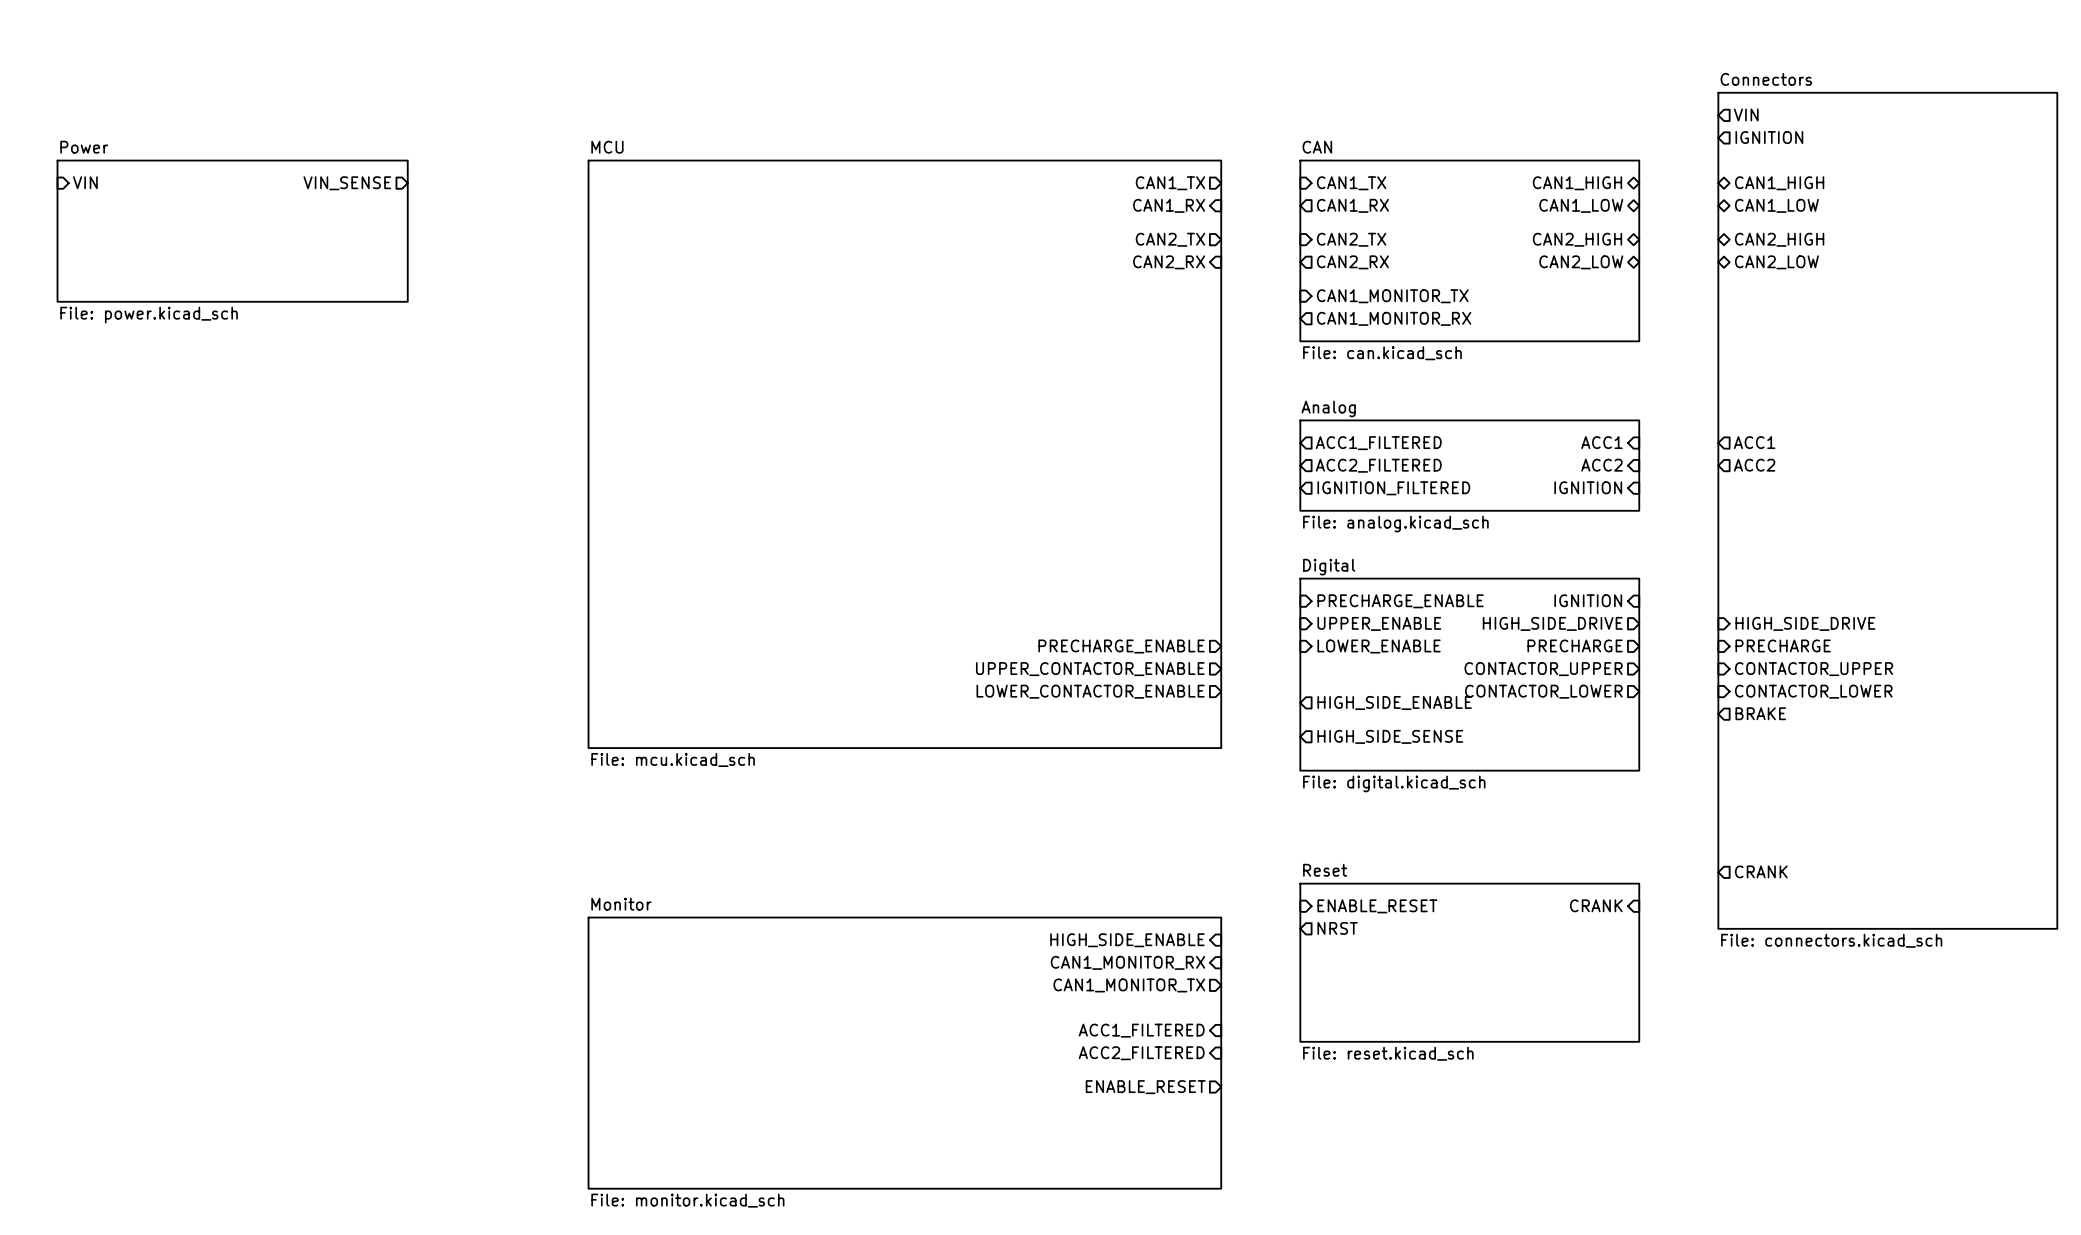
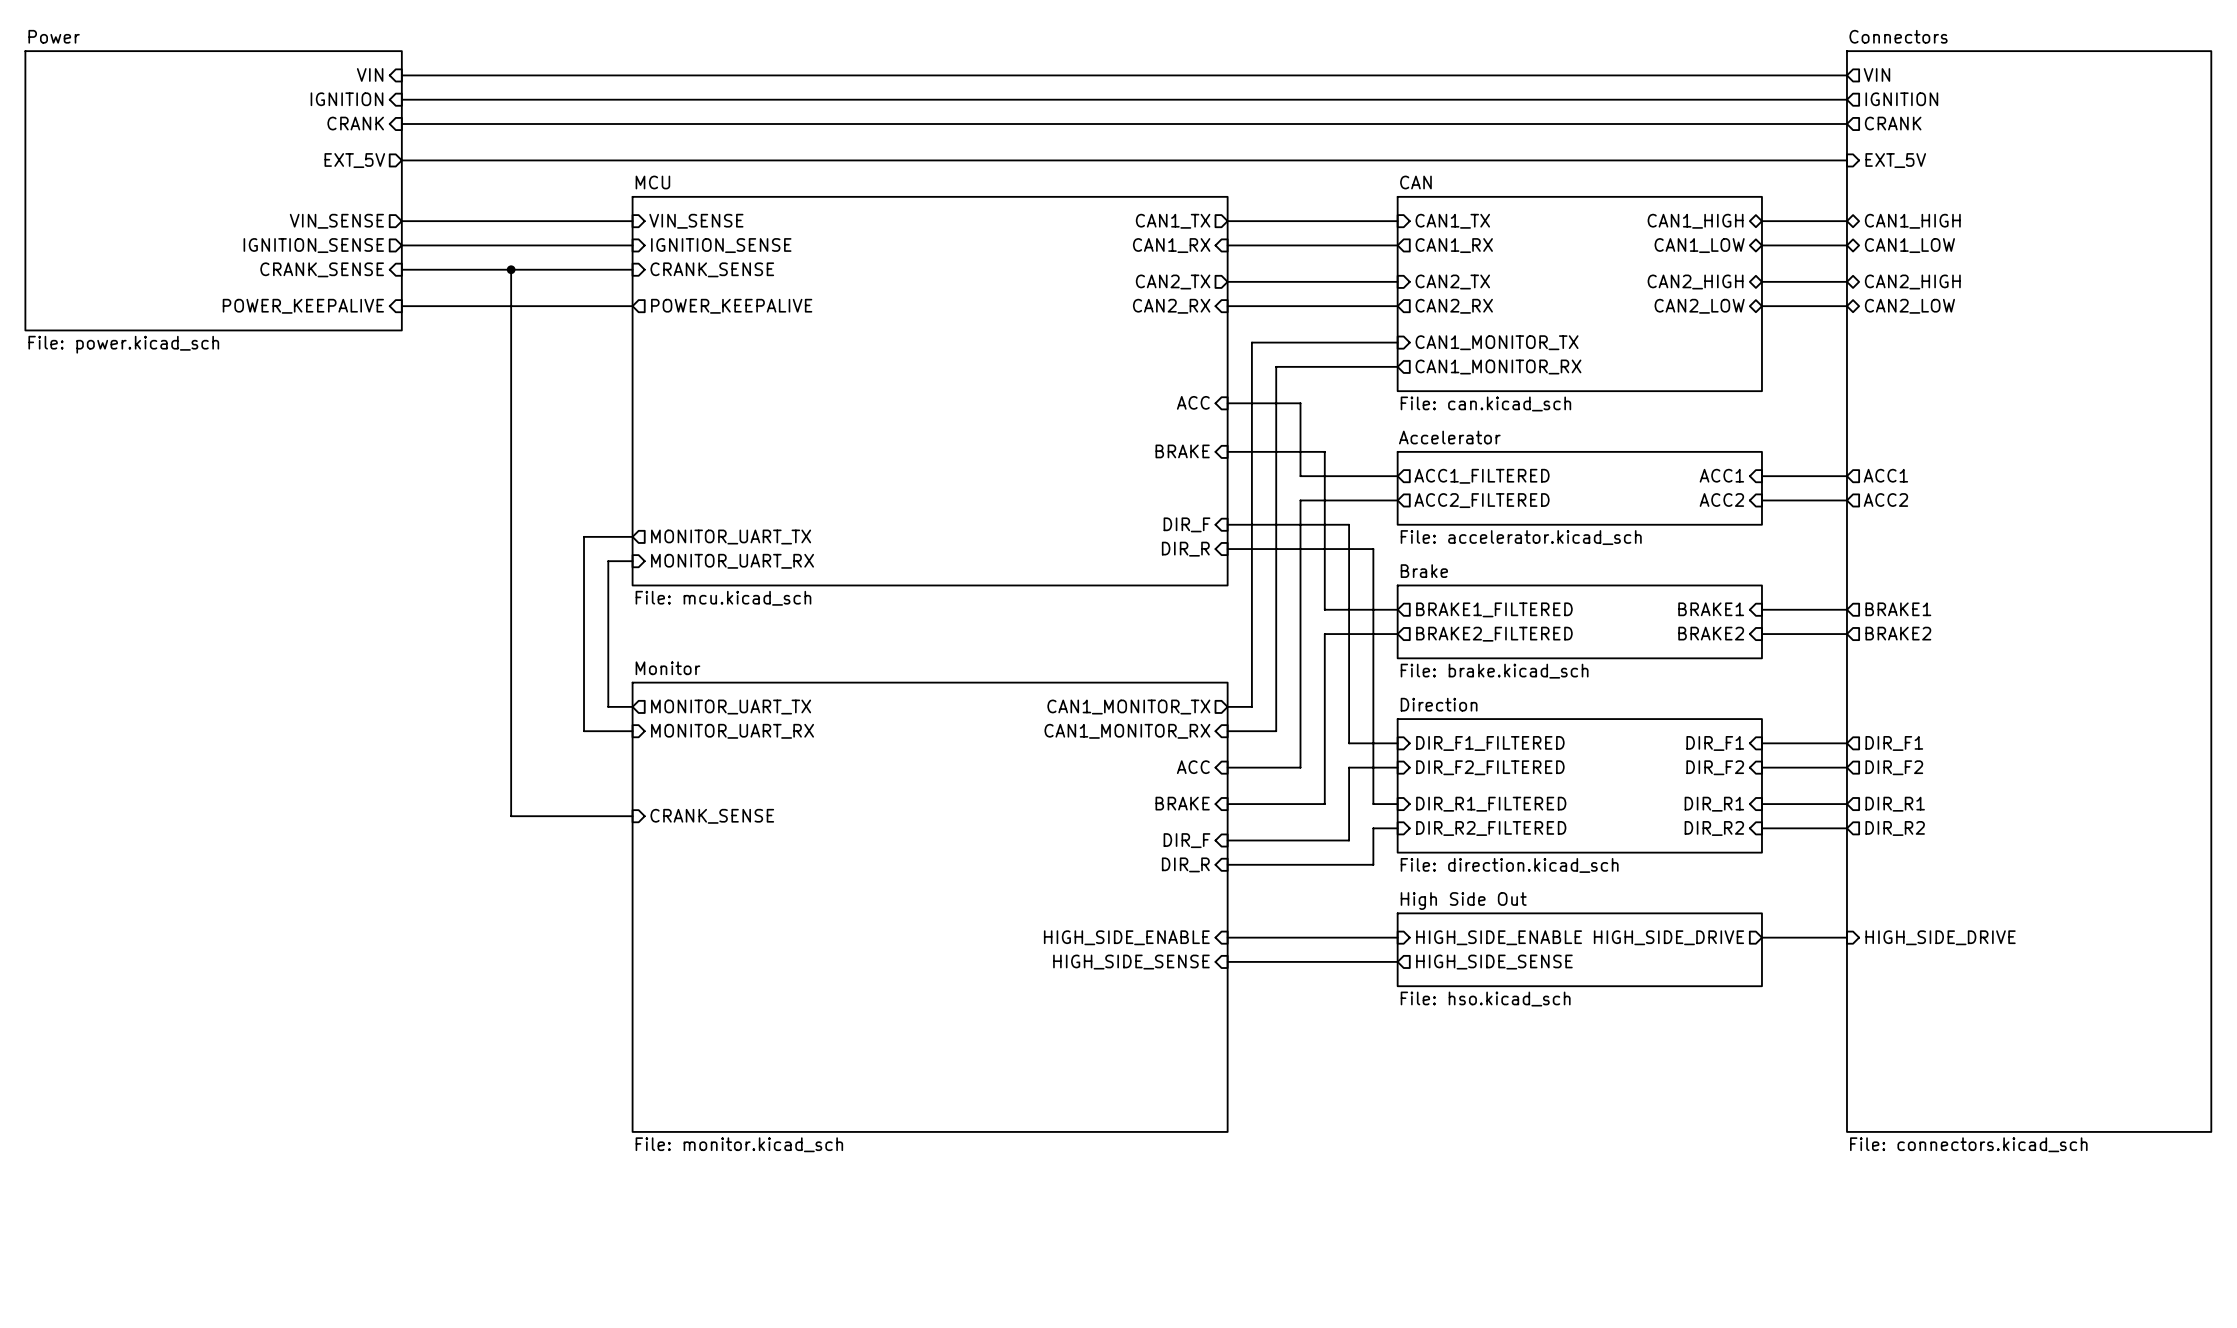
sheet pin: none -> VIN (370, 74)
sheet pin: none -> VIN (1876, 74)
wire: none -> (401, 75) (1846, 75)
sheet pin: none -> IGNITION (347, 99)
wire: none -> (401, 99) (1846, 99)
sheet pin: none -> CRANK (355, 123)
sheet pin: VIN (1746, 114) -> CRANK (1893, 123)
wire: none -> (401, 124) (1846, 124)
sheet pin position: IGNITION (1769, 137) -> IGNITION (1901, 99)
sheet pin: none -> EXT_5V (354, 160)
wire: none -> (401, 160) (1846, 160)
sheet pin: none -> EXT_5V (1895, 160)
sheet Power: none -> File: power.kicad_sch (213, 190)
sheet pin: VIN (85, 182) -> none
sheet pin position: VIN_SENSE (347, 183) -> VIN_SENSE (336, 221)
sheet pin position: CAN1_TX (1170, 183) -> CAN1_TX (1173, 221)
sheet pin: CAN1_TX (1351, 183) -> none
sheet pin: CAN1_HIGH (1577, 183) -> none
sheet pin: CAN1_HIGH (1779, 183) -> none
wire: none -> (401, 221) (632, 221)
sheet pin: none -> VIN_SENSE (696, 221)
wire: none -> (1227, 221) (1397, 221)
sheet pin position: CAN1_RX (1169, 205) -> CAN1_RX (1171, 245)
sheet pin shape: output (1352, 205) -> input (1452, 221)
sheet pin: CAN1_RX (1352, 205) -> CAN1_TX (1452, 221)
sheet pin: CAN1_LOW (1581, 205) -> CAN1_HIGH (1695, 221)
wire: none -> (1761, 221) (1846, 221)
sheet pin: CAN1_LOW (1776, 205) -> CAN1_HIGH (1912, 221)
sheet pin: none -> IGNITION_SENSE (313, 245)
wire: none -> (401, 245) (632, 245)
sheet pin: none -> IGNITION_SENSE (721, 245)
wire: none -> (1227, 245) (1397, 245)
sheet pin: none -> CAN1_LOW (1699, 245)
wire: none -> (1761, 245) (1846, 245)
sheet pin: none -> CAN1_LOW (1909, 245)
sheet Power: File: power.kicad_sch (232, 231) -> none
sheet pin position: CAN2_TX (1170, 239) -> CAN2_TX (1173, 281)
sheet pin shape: input (1351, 239) -> output (1454, 245)
sheet pin: CAN2_TX (1351, 239) -> CAN1_RX (1454, 245)
sheet pin: CAN2_HIGH (1577, 239) -> none
sheet pin: CAN2_HIGH (1779, 239) -> none
wire: none -> (401, 269) (632, 269)
wire: none -> (511, 269) (511, 816) (632, 816)
junction: none -> (511, 269)
sheet CAN position: (1469, 250) -> (1579, 294)
sheet pin: none -> CRANK_SENSE (322, 269)
sheet pin: none -> CRANK_SENSE (712, 269)
wire: none -> (1227, 281) (1397, 281)
sheet pin position: CAN2_RX (1169, 262) -> CAN2_RX (1171, 306)
sheet pin shape: output (1352, 262) -> input (1452, 281)
sheet pin: CAN2_RX (1352, 262) -> CAN2_TX (1452, 281)
sheet pin: CAN2_LOW (1581, 262) -> CAN2_HIGH (1695, 281)
wire: none -> (1761, 281) (1846, 281)
sheet pin: CAN2_LOW (1776, 262) -> CAN2_HIGH (1912, 281)
sheet pin: none -> POWER_KEEPALIVE (303, 306)
wire: none -> (401, 306) (632, 306)
sheet pin: none -> POWER_KEEPALIVE (731, 306)
wire: none -> (1227, 306) (1397, 306)
sheet pin: none -> CAN2_RX (1454, 306)
sheet pin: none -> CAN2_LOW (1699, 306)
wire: none -> (1761, 306) (1846, 306)
sheet pin: none -> CAN2_LOW (1909, 306)
sheet pin: CAN1_MONITOR_TX (1392, 296) -> none
wire: none -> (1397, 342) (1251, 342) (1251, 706) (1227, 706)
sheet pin shape: output (1394, 318) -> input (1497, 342)
sheet pin: CAN1_MONITOR_RX (1394, 318) -> CAN1_MONITOR_TX (1497, 342)
wire: none -> (1397, 366) (1276, 366) (1276, 731) (1227, 731)
sheet pin: none -> CAN1_MONITOR_RX (1498, 367)
sheet MCU: none -> File: mcu.kicad_sch (930, 391)
sheet pin: none -> ACC (1193, 402)
wire: none -> (1227, 403) (1300, 403) (1300, 476) (1397, 476)
sheet pin: none -> BRAKE (1182, 451)
wire: none -> (1227, 451) (1324, 451) (1324, 609) (1397, 609)
wire: none -> (1761, 476) (1846, 476)
sheet MCU: File: mcu.kicad_sch (904, 454) -> none
sheet Accelerator: none -> File: accelerator.kicad_sch (1579, 488)
wire: none -> (1397, 500) (1300, 500) (1300, 767) (1227, 767)
sheet Analog: File: analog.kicad_sch (1469, 465) -> none
wire: none -> (1761, 500) (1846, 500)
sheet pin: IGNITION (1588, 487) -> none
sheet pin: none -> DIR_F (1186, 524)
wire: none -> (1227, 524) (1349, 524) (1349, 743) (1397, 743)
sheet pin: IGNITION_FILTERED (1393, 488) -> none
wire: none -> (632, 536) (584, 536) (584, 731) (632, 731)
sheet pin: none -> MONITOR_UART_TX (731, 537)
sheet pin: none -> DIR_R (1185, 549)
wire: none -> (1227, 549) (1373, 549) (1373, 804) (1397, 804)
sheet Connectors: File: connectors.kicad_sch (1887, 510) -> none
wire: none -> (632, 561) (608, 561) (608, 706) (632, 706)
sheet pin: none -> MONITOR_UART_RX (732, 561)
sheet Connectors: none -> File: connectors.kicad_sch (2029, 591)
sheet pin: none -> BRAKE1 (1711, 609)
sheet pin: none -> BRAKE1 (1898, 609)
sheet pin: none -> BRAKE1_FILTERED (1494, 609)
wire: none -> (1761, 609) (1846, 609)
sheet Brake: none -> File: brake.kicad_sch (1579, 621)
wire: none -> (1397, 634) (1324, 634) (1324, 804) (1227, 804)
sheet pin: none -> BRAKE2 (1711, 633)
wire: none -> (1761, 634) (1846, 634)
sheet pin: none -> BRAKE2 (1898, 633)
sheet pin: none -> BRAKE2_FILTERED (1494, 634)
sheet pin: IGNITION (1588, 600) -> none
sheet pin: PRECHARGE_ENABLE (1400, 601) -> none
sheet pin: UPPER_ENABLE (1379, 623) -> none
sheet pin: HIGH_SIDE_DRIVE (1552, 623) -> none
sheet pin: HIGH_SIDE_DRIVE (1805, 623) -> none
sheet pin: PRECHARGE (1575, 645) -> none
sheet pin: PRECHARGE (1783, 645) -> none
sheet pin: PRECHARGE_ENABLE (1121, 646) -> none
sheet pin: LOWER_ENABLE (1379, 646) -> none
sheet pin: none -> MONITOR_UART_TX (731, 707)
sheet pin: none -> CAN1_MONITOR_TX (1128, 707)
sheet pin: UPPER_CONTACTOR_ENABLE (1090, 669) -> none
sheet pin: CONTACTOR_UPPER (1543, 669) -> none
sheet pin: CONTACTOR_UPPER (1814, 669) -> none
sheet Digital: File: digital.kicad_sch (1469, 674) -> none
sheet pin: none -> MONITOR_UART_RX (732, 731)
sheet pin: none -> CAN1_MONITOR_RX (1127, 731)
sheet pin: LOWER_CONTACTOR_ENABLE (1090, 691) -> none
sheet pin: none -> DIR_F1_FILTERED (1490, 743)
sheet pin shape: output (1543, 691) -> input (1715, 743)
sheet pin: CONTACTOR_LOWER (1543, 691) -> DIR_F1 (1715, 743)
wire: none -> (1761, 743) (1846, 743)
sheet pin shape: input (1813, 691) -> output (1894, 743)
sheet pin: CONTACTOR_LOWER (1813, 691) -> DIR_F1 (1894, 743)
sheet pin: HIGH_SIDE_ENABLE (1394, 702) -> none
sheet pin: none -> ACC (1193, 767)
sheet pin: BRAKE (1760, 713) -> DIR_F2 (1894, 767)
wire: none -> (1397, 767) (1349, 767) (1349, 840) (1227, 840)
sheet pin: none -> DIR_F2_FILTERED (1490, 767)
sheet pin: none -> DIR_F2 (1715, 767)
wire: none -> (1761, 767) (1846, 767)
sheet Direction: none -> File: direction.kicad_sch (1579, 785)
sheet pin: HIGH_SIDE_SENSE (1390, 736) -> none
sheet pin: none -> BRAKE (1182, 803)
sheet pin: none -> DIR_R1_FILTERED (1491, 804)
sheet pin: none -> DIR_R1 (1714, 804)
wire: none -> (1761, 804) (1846, 804)
sheet pin: none -> DIR_R1 (1895, 804)
sheet pin: none -> CRANK_SENSE (712, 816)
wire: none -> (1397, 828) (1373, 828) (1373, 864) (1227, 864)
sheet pin: none -> DIR_R2_FILTERED (1491, 828)
sheet pin: none -> DIR_R2 (1714, 828)
wire: none -> (1761, 828) (1846, 828)
sheet pin: none -> DIR_R2 (1895, 828)
sheet pin: none -> DIR_F (1186, 840)
sheet pin: none -> DIR_R (1185, 864)
sheet Monitor: none -> File: monitor.kicad_sch (930, 907)
sheet pin shape: output (1761, 871) -> input (1940, 937)
sheet pin: CRANK (1761, 871) -> HIGH_SIDE_DRIVE (1940, 937)
sheet pin: none -> HIGH_SIDE_ENABLE (1126, 937)
wire: none -> (1227, 937) (1397, 937)
sheet pin: none -> HIGH_SIDE_ENABLE (1499, 937)
sheet pin: none -> HIGH_SIDE_DRIVE (1668, 937)
wire: none -> (1761, 937) (1846, 937)
sheet High Side Out: none -> File: hso.kicad_sch (1579, 949)
wire: none -> (1227, 961) (1397, 961)
sheet pin: none -> HIGH_SIDE_SENSE (1131, 962)
sheet pin: none -> HIGH_SIDE_SENSE (1494, 962)
sheet pin: CRANK (1596, 905) -> none
sheet pin: ENABLE_RESET (1377, 906) -> none
sheet pin: NRST (1337, 928) -> none
sheet pin: HIGH_SIDE_ENABLE (1127, 940) -> none
sheet pin: CAN1_MONITOR_RX (1127, 962) -> none
sheet Reset: File: reset.kicad_sch (1469, 962) -> none
sheet pin: CAN1_MONITOR_TX (1129, 985) -> none
sheet pin: ACC1_FILTERED (1141, 1030) -> none
sheet Monitor: File: monitor.kicad_sch (904, 1053) -> none
sheet pin: ACC2_FILTERED (1141, 1053) -> none
sheet pin: ENABLE_RESET (1145, 1087) -> none

